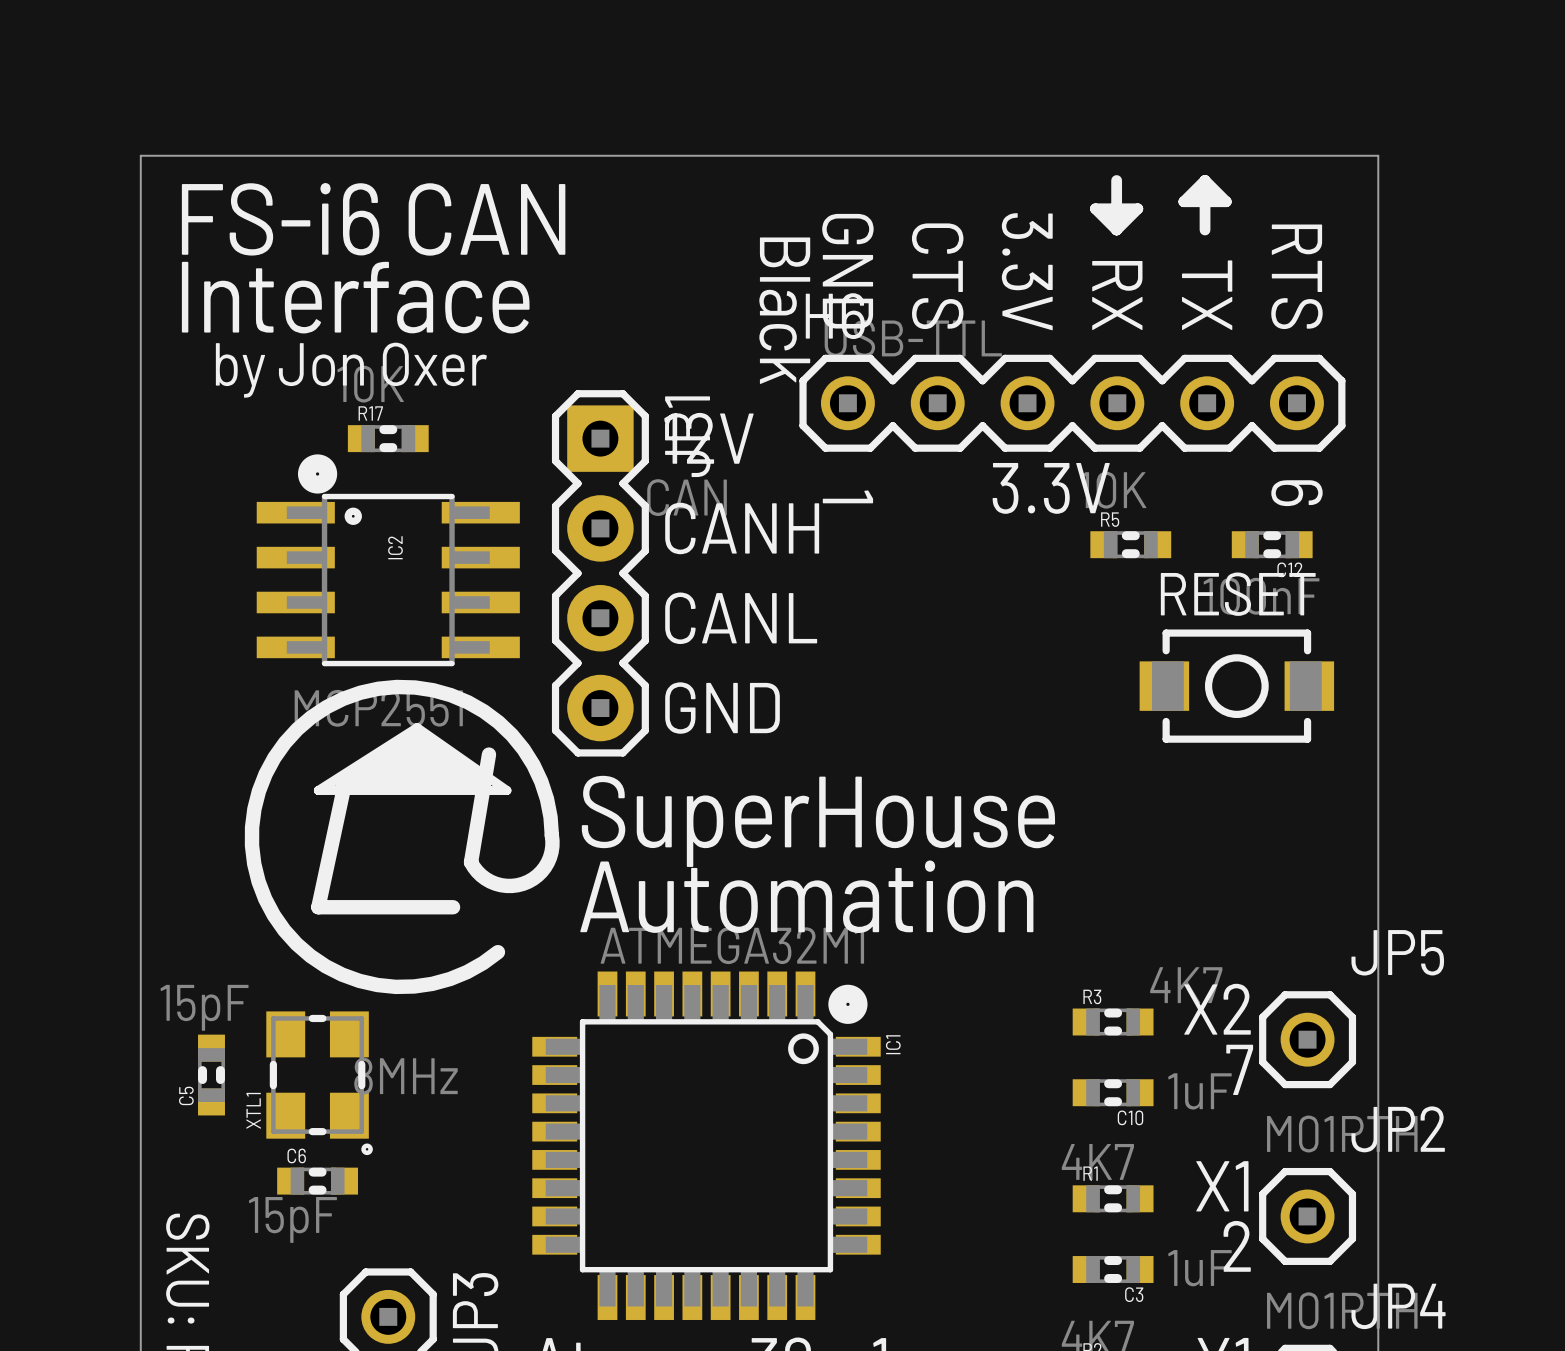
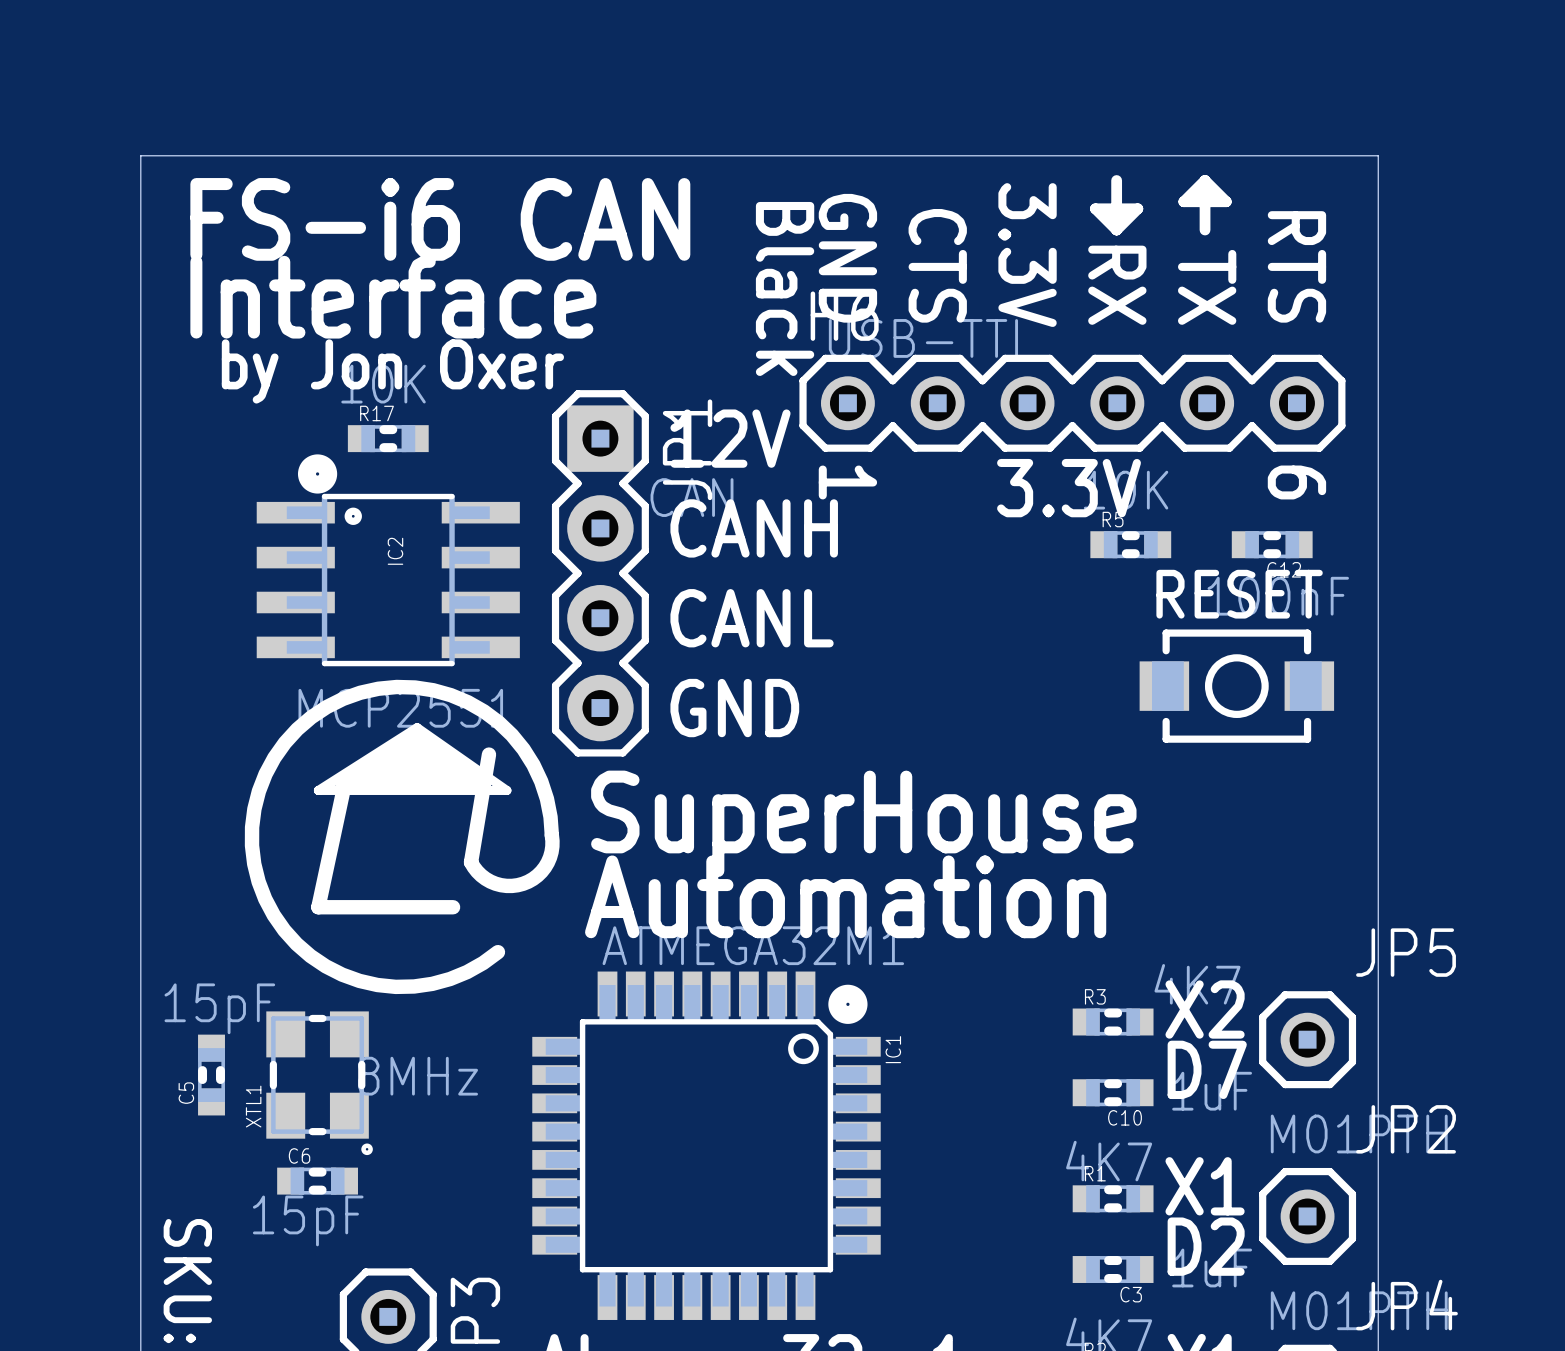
text: 7 (1239, 1069) -> D7 (1207, 1069)
text: 2 (1237, 1246) -> D2 (1206, 1246)

